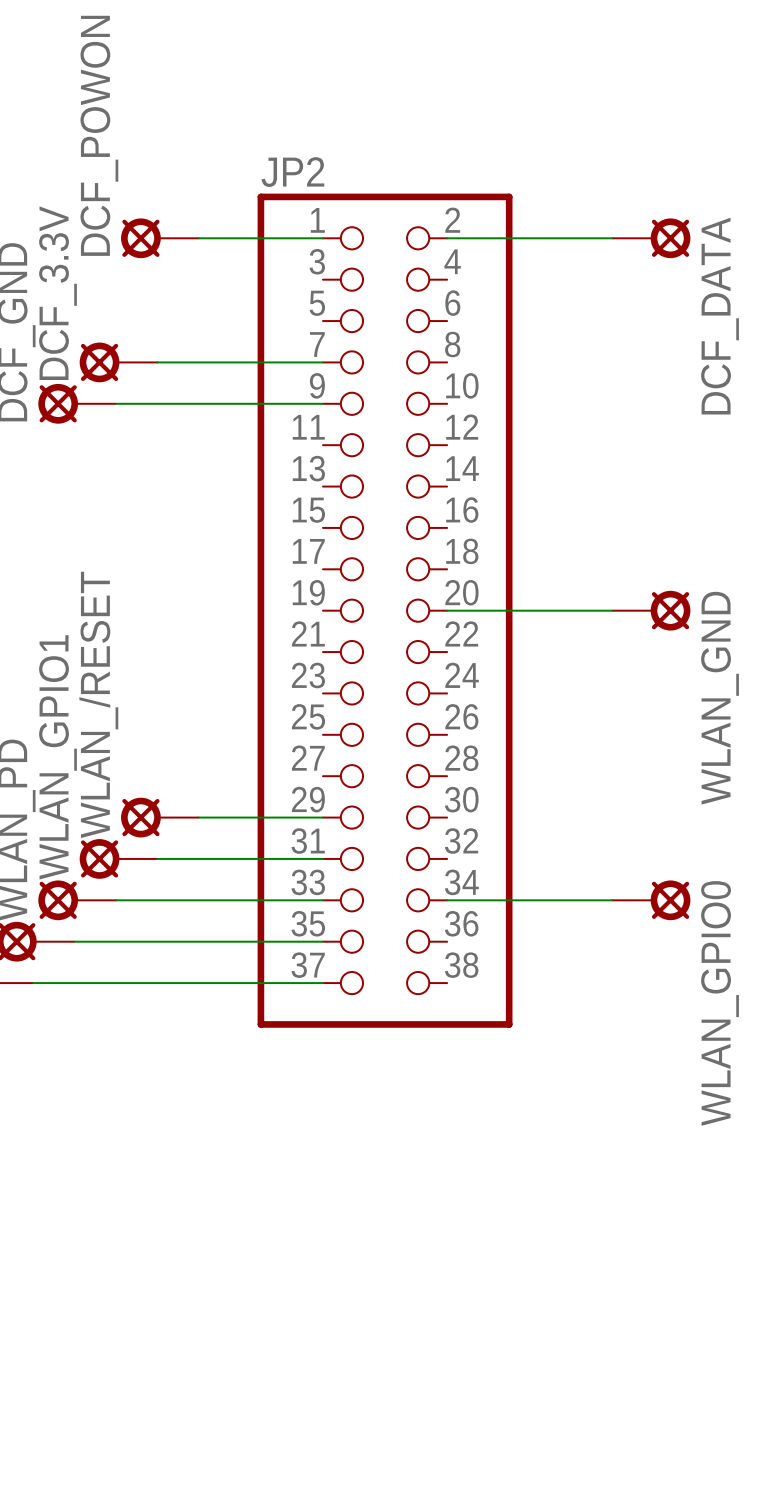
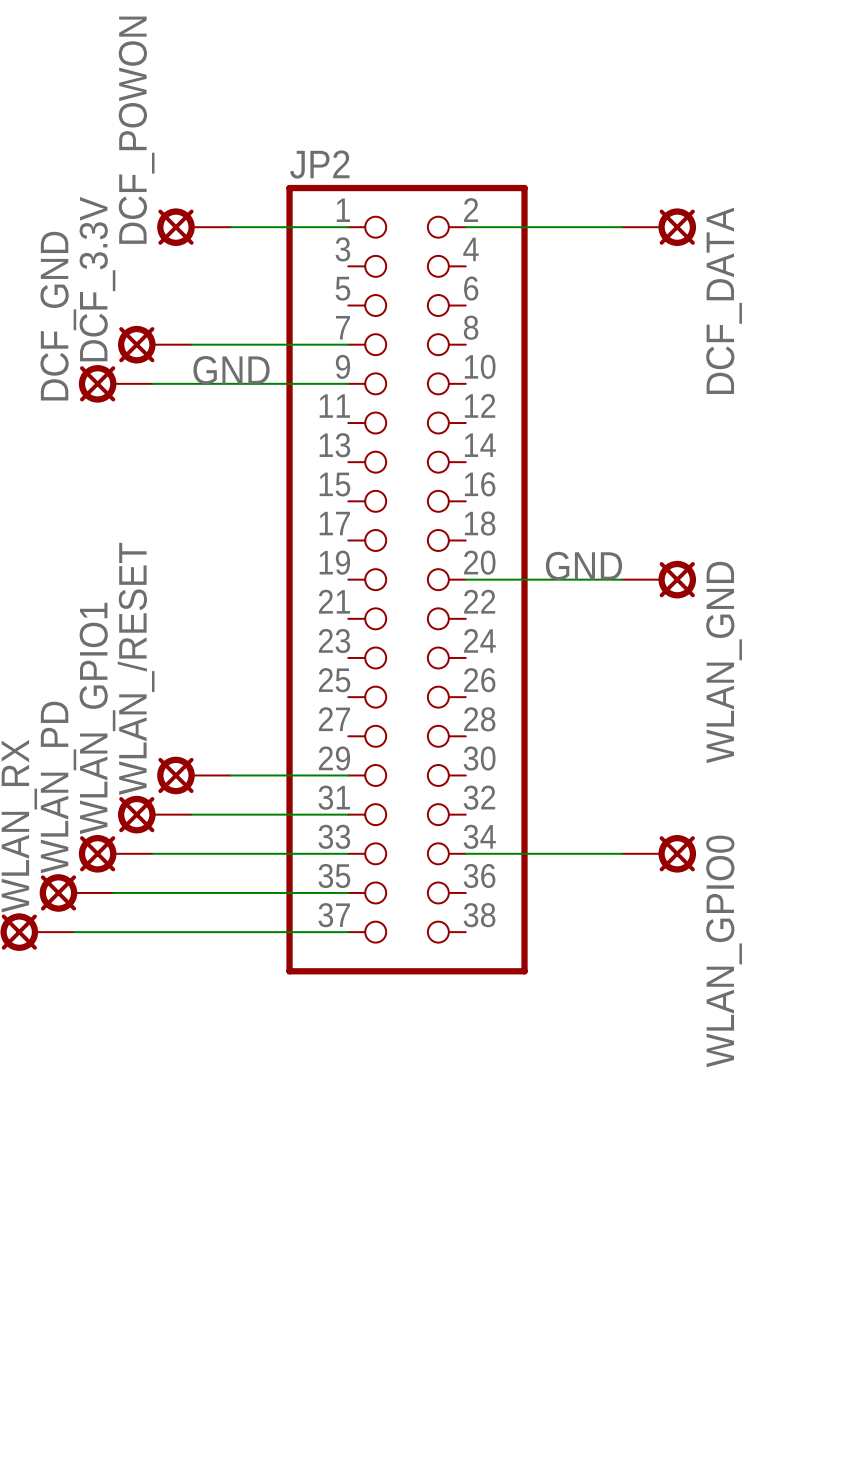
label: none -> GND (231, 370)
label: none -> GND (583, 565)

